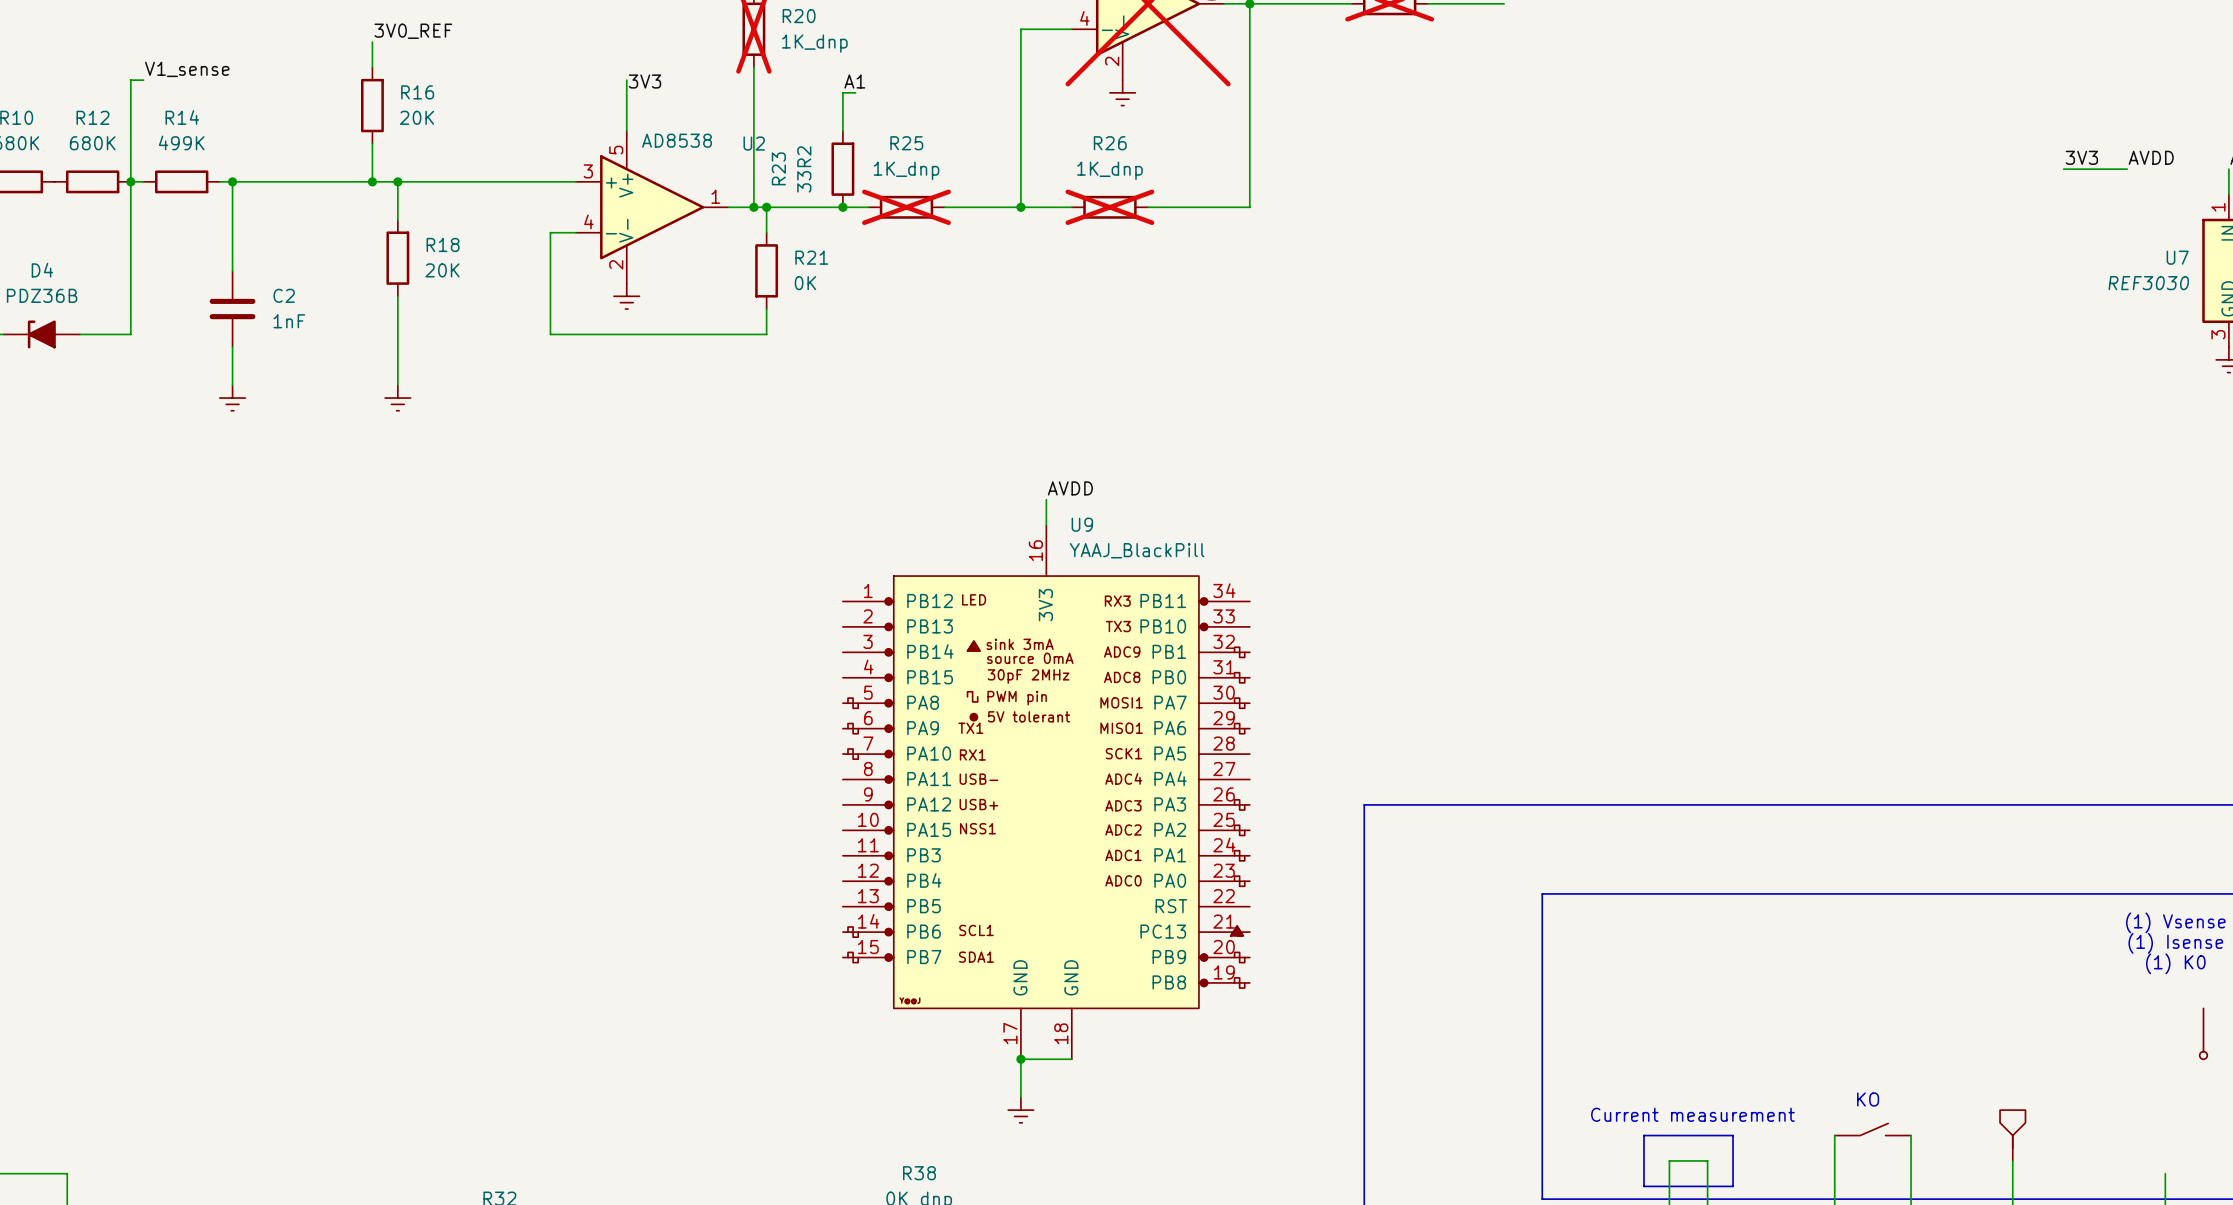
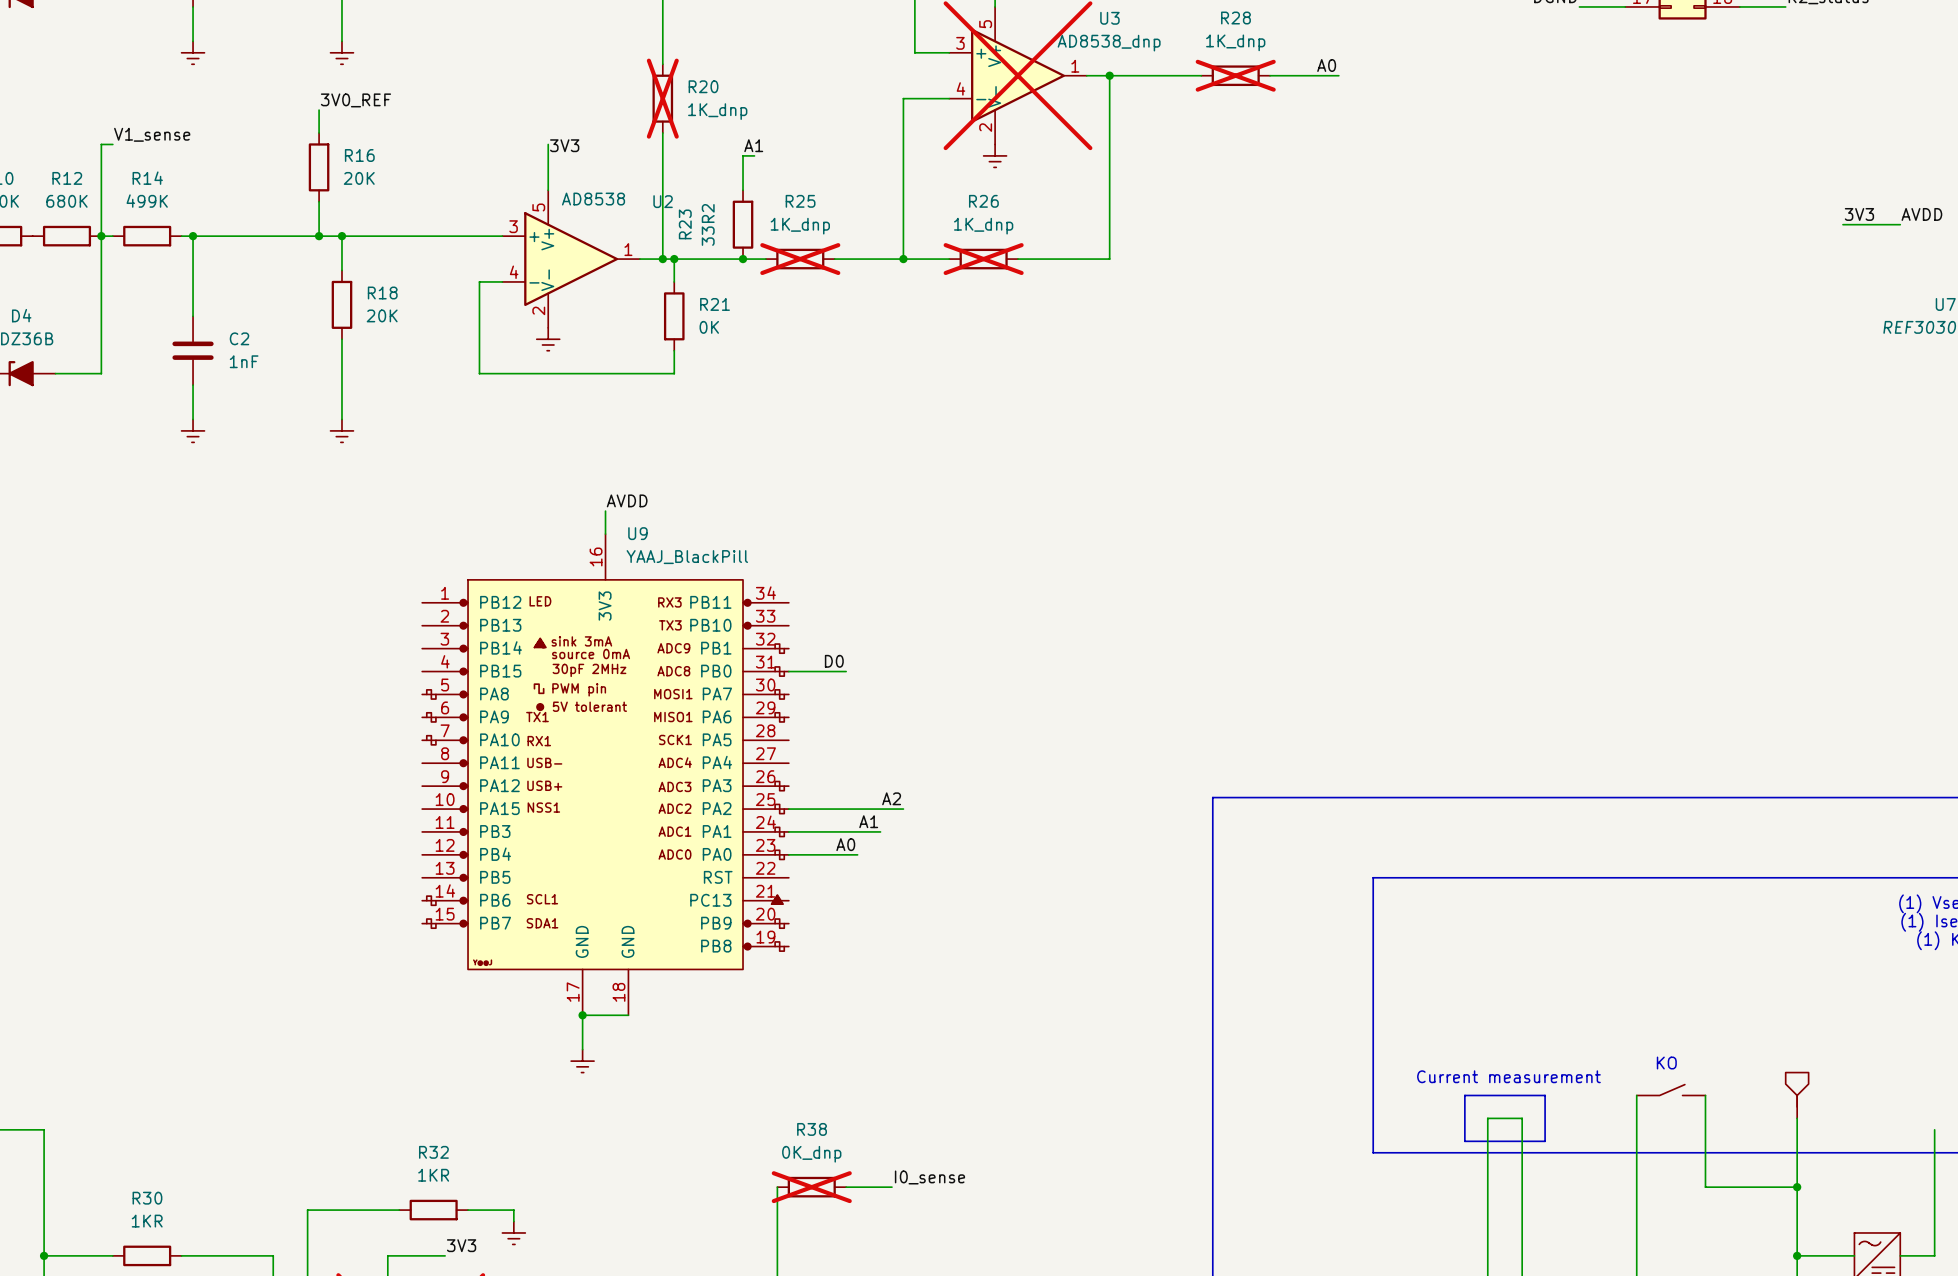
label: none -> AVDD (627, 500)
wire: none -> (605, 511) (605, 534)
label: AVDD (1070, 488) -> none
wire: (1046, 499) (1046, 525) -> none
label: none -> D0 (834, 661)
U9 position: (1046, 792) -> (605, 774)
label: none -> A2 (891, 798)
label: none -> A1 (868, 821)
label: none -> A0 (845, 844)
junction: none -> (582, 1015)
wire: none -> (628, 1015) (582, 1015) (582, 1049)
junction: (1020, 1059) -> none
wire: (1071, 1059) (1020, 1059) (1020, 1097) -> none
power symbol: none -> (582, 1061)
power symbol: (1020, 1110) -> none

